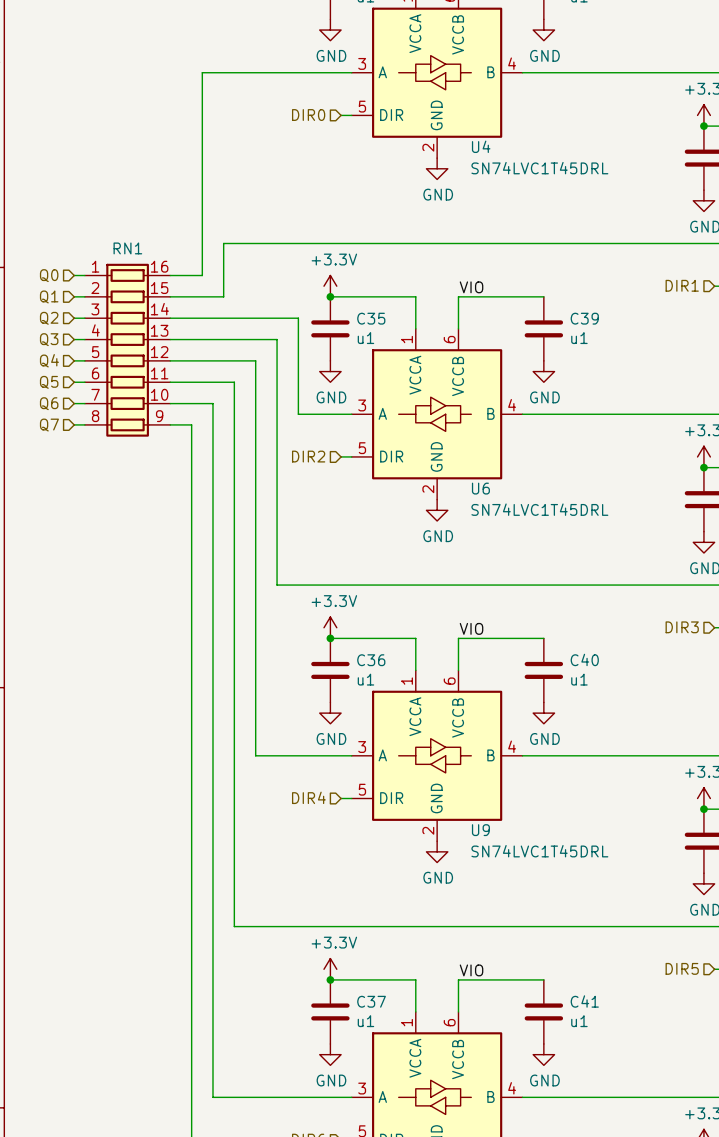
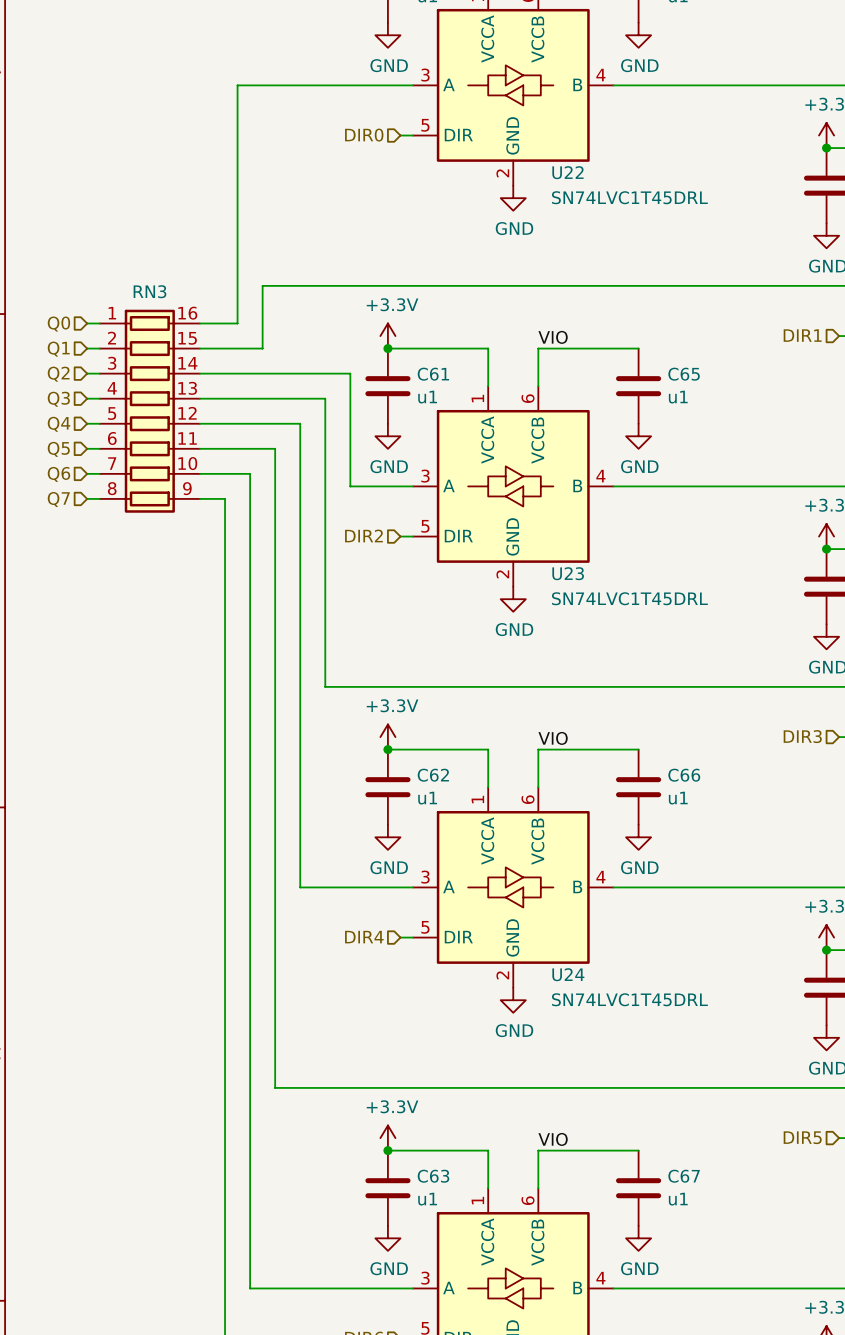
U4 name: U4 (481, 146) -> U22 (567, 172)
RN1 name: RN1 (127, 248) -> RN3 (149, 291)
C35 name: C35 (371, 318) -> C61 (433, 374)
C39 name: C39 (584, 318) -> C65 (684, 374)
U6 name: U6 (480, 488) -> U23 (568, 573)
C40 name: C40 (584, 659) -> C66 (684, 775)
C36 name: C36 (371, 660) -> C62 (433, 775)
U9 name: U9 (480, 830) -> U24 (568, 974)
C37 name: C37 (371, 1001) -> C63 (433, 1176)
C41 name: C41 (584, 1001) -> C67 (684, 1176)

